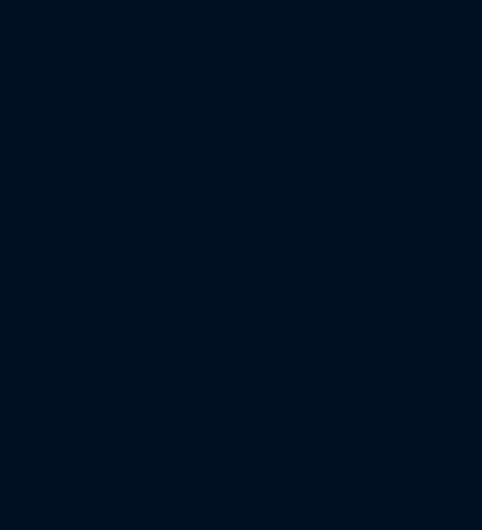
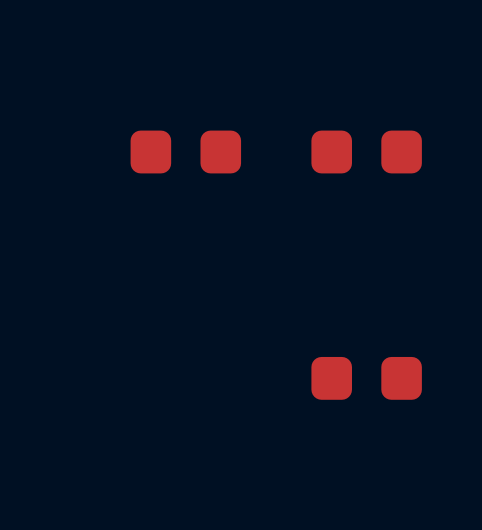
part: none -> (185, 152)
part: none -> (366, 152)
part: none -> (366, 378)

